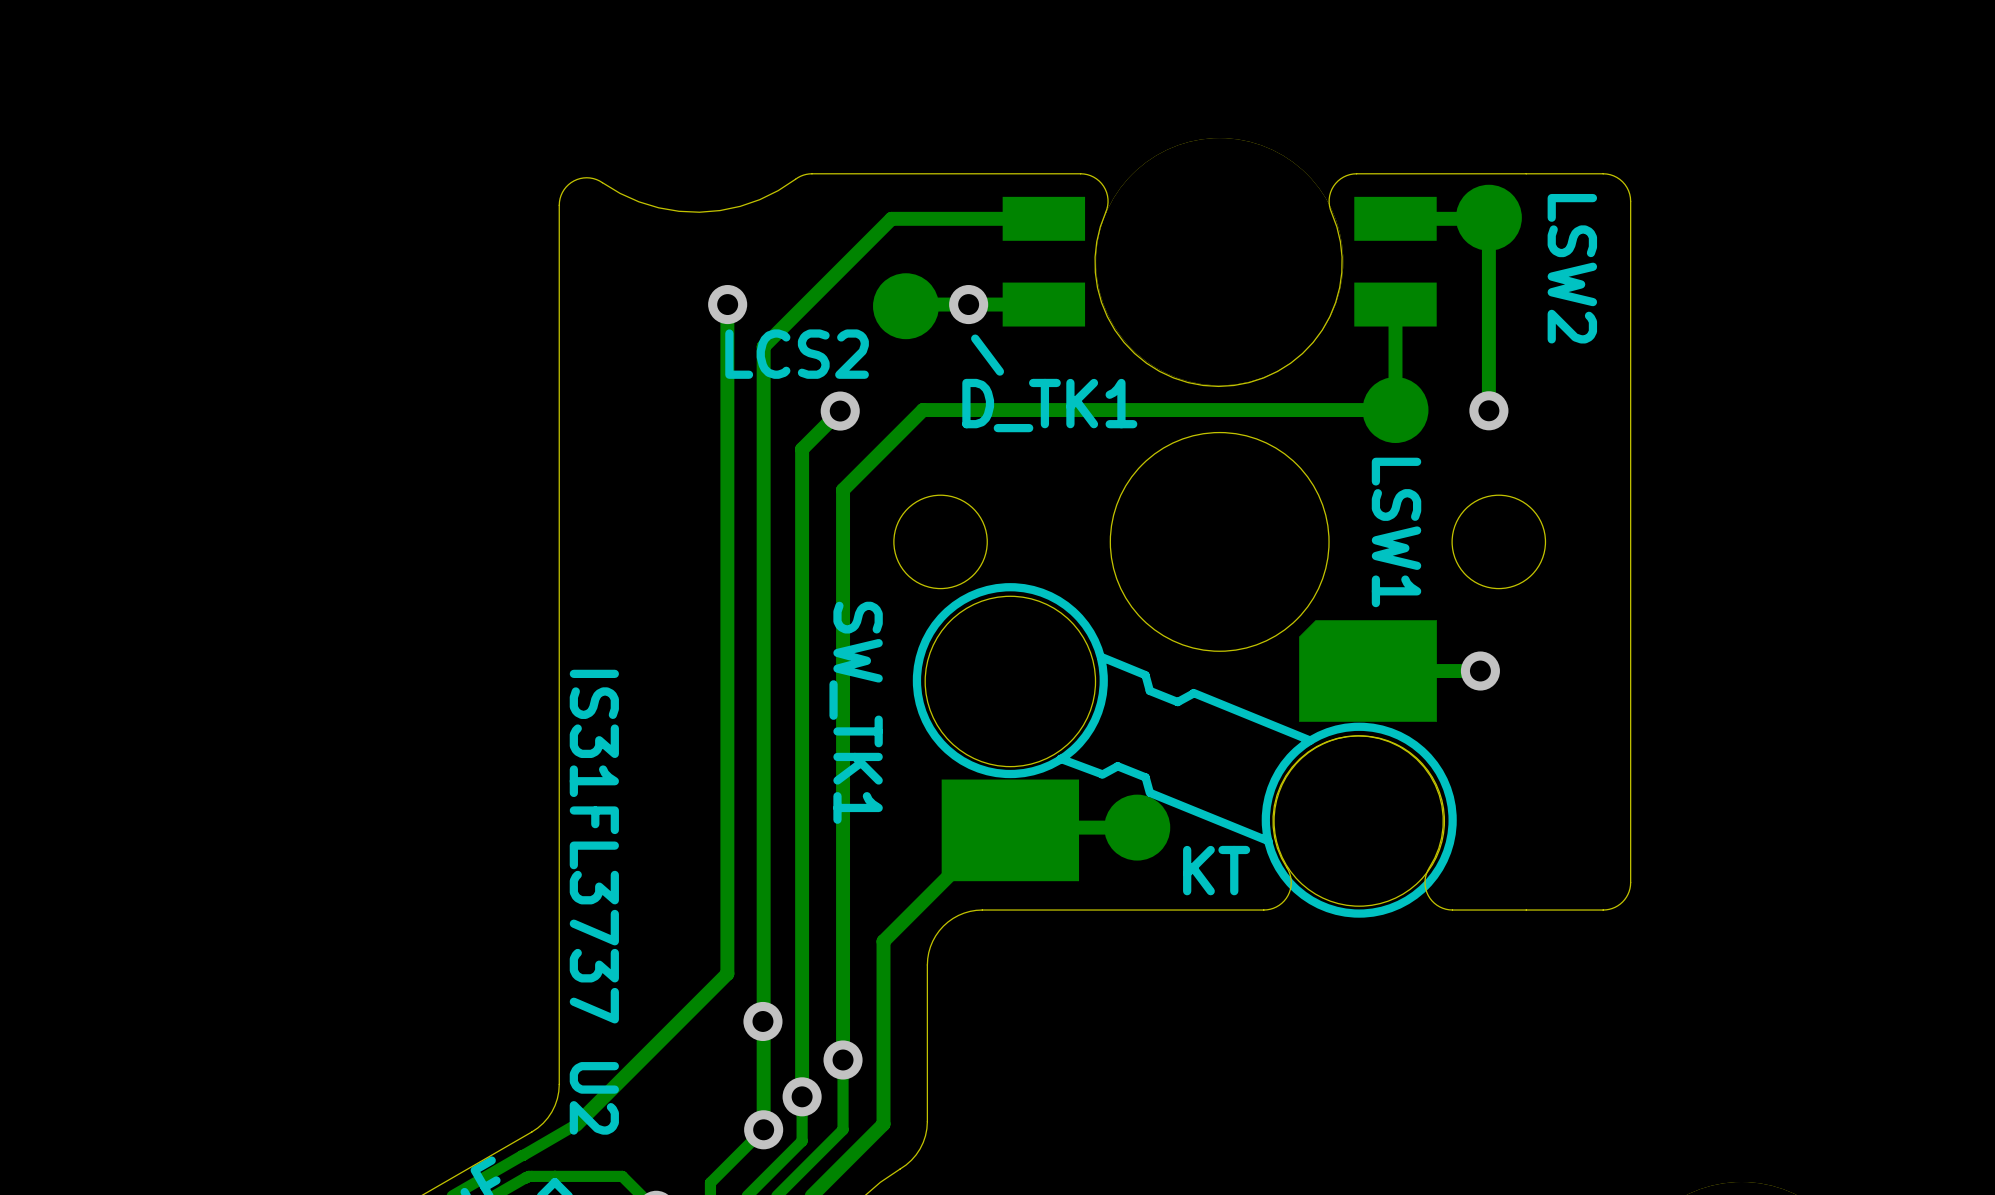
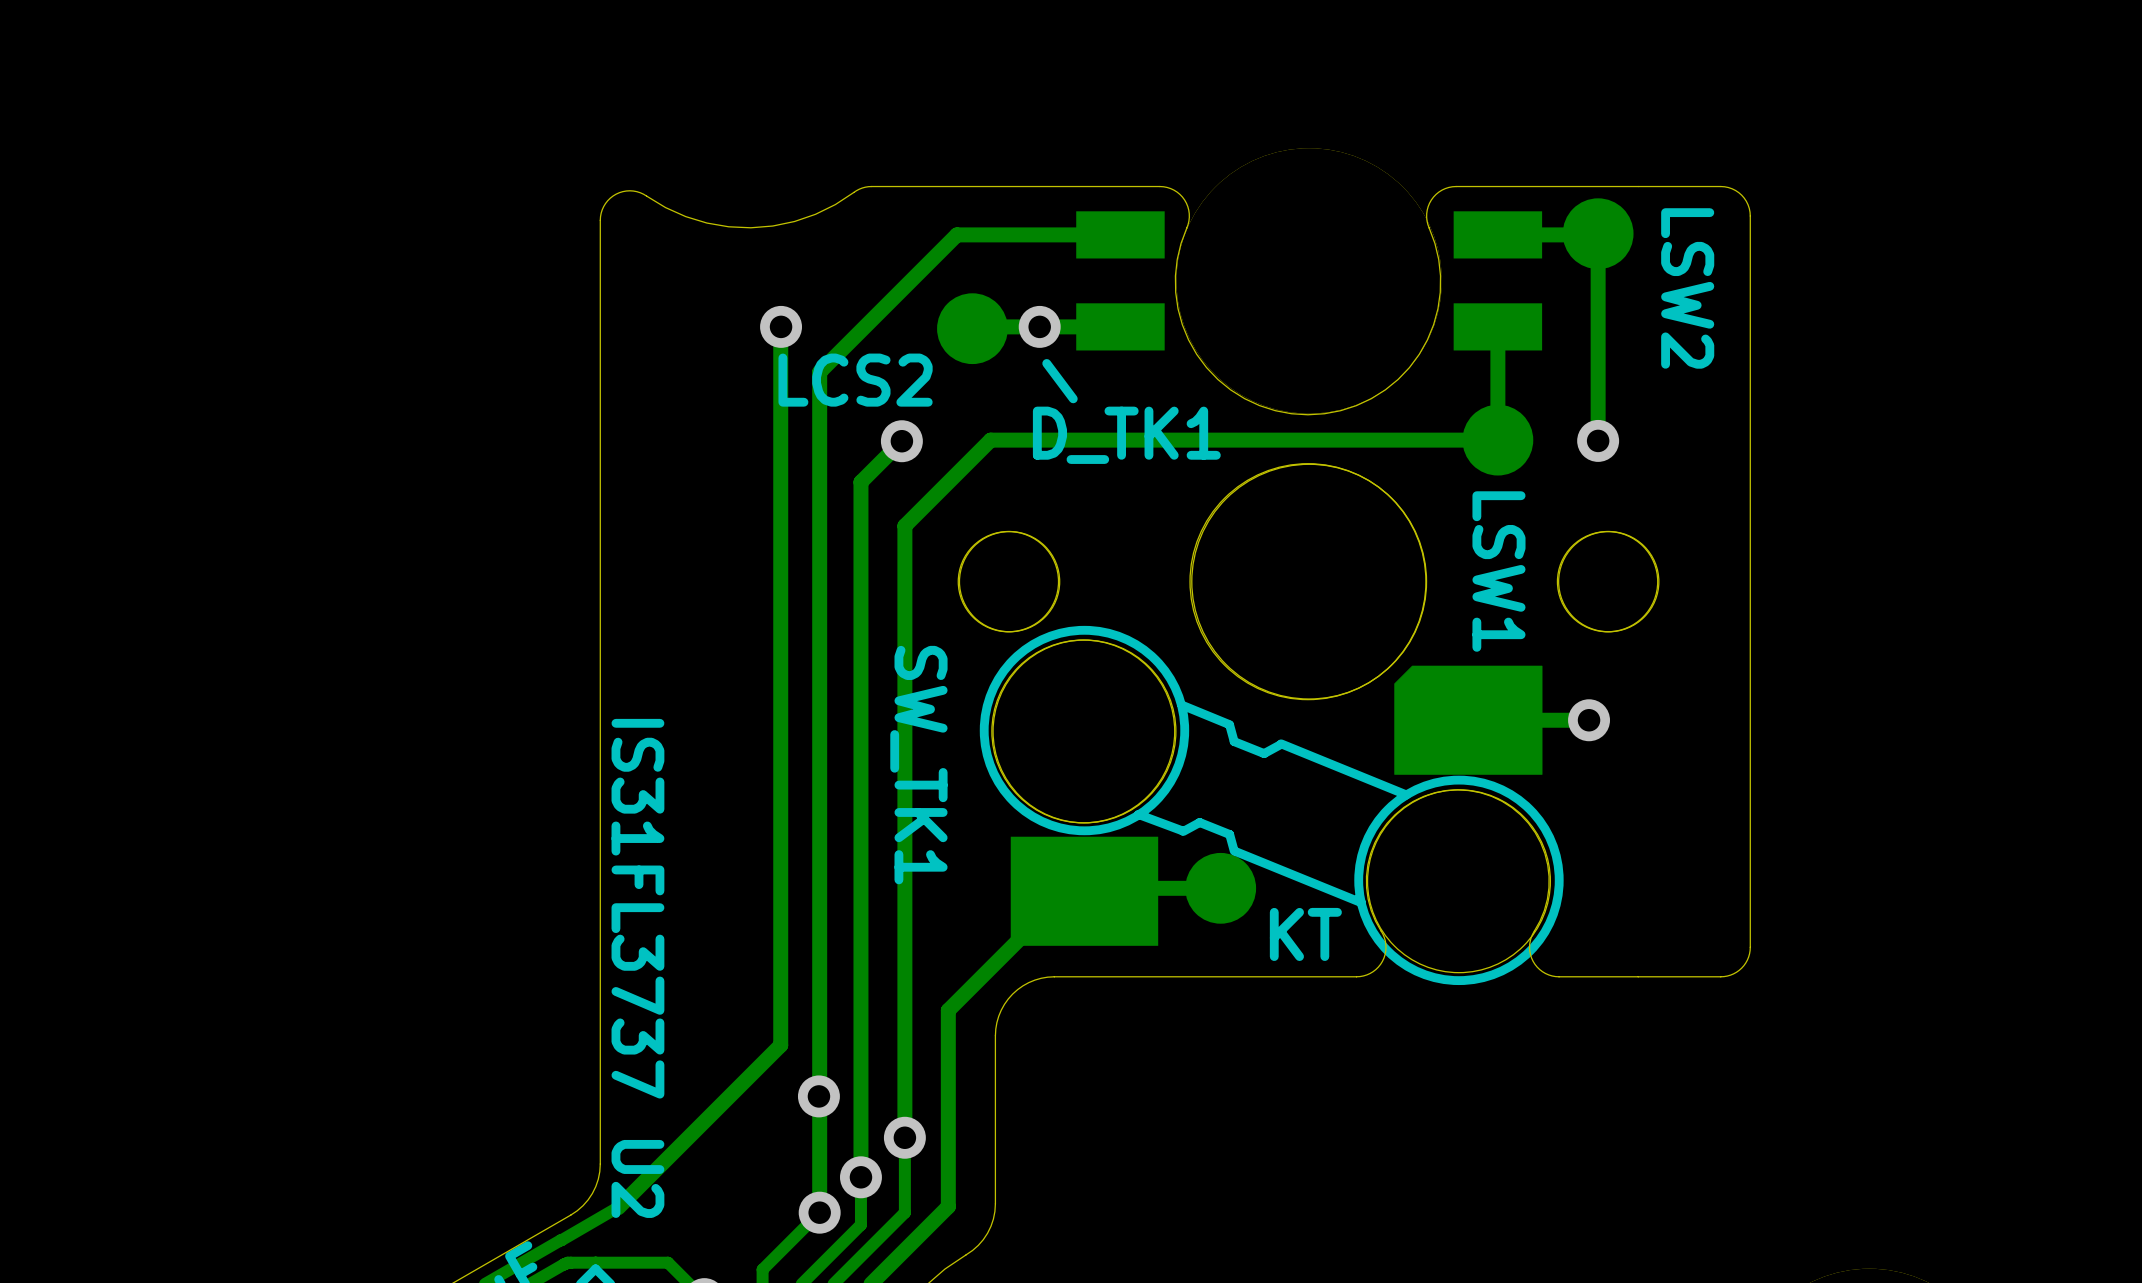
round board edge: none -> [1189, 463, 1427, 700]
round board edge: none -> [957, 531, 1059, 633]
round board edge: none -> [1557, 531, 1658, 633]
round board edge: none -> [991, 639, 1176, 824]

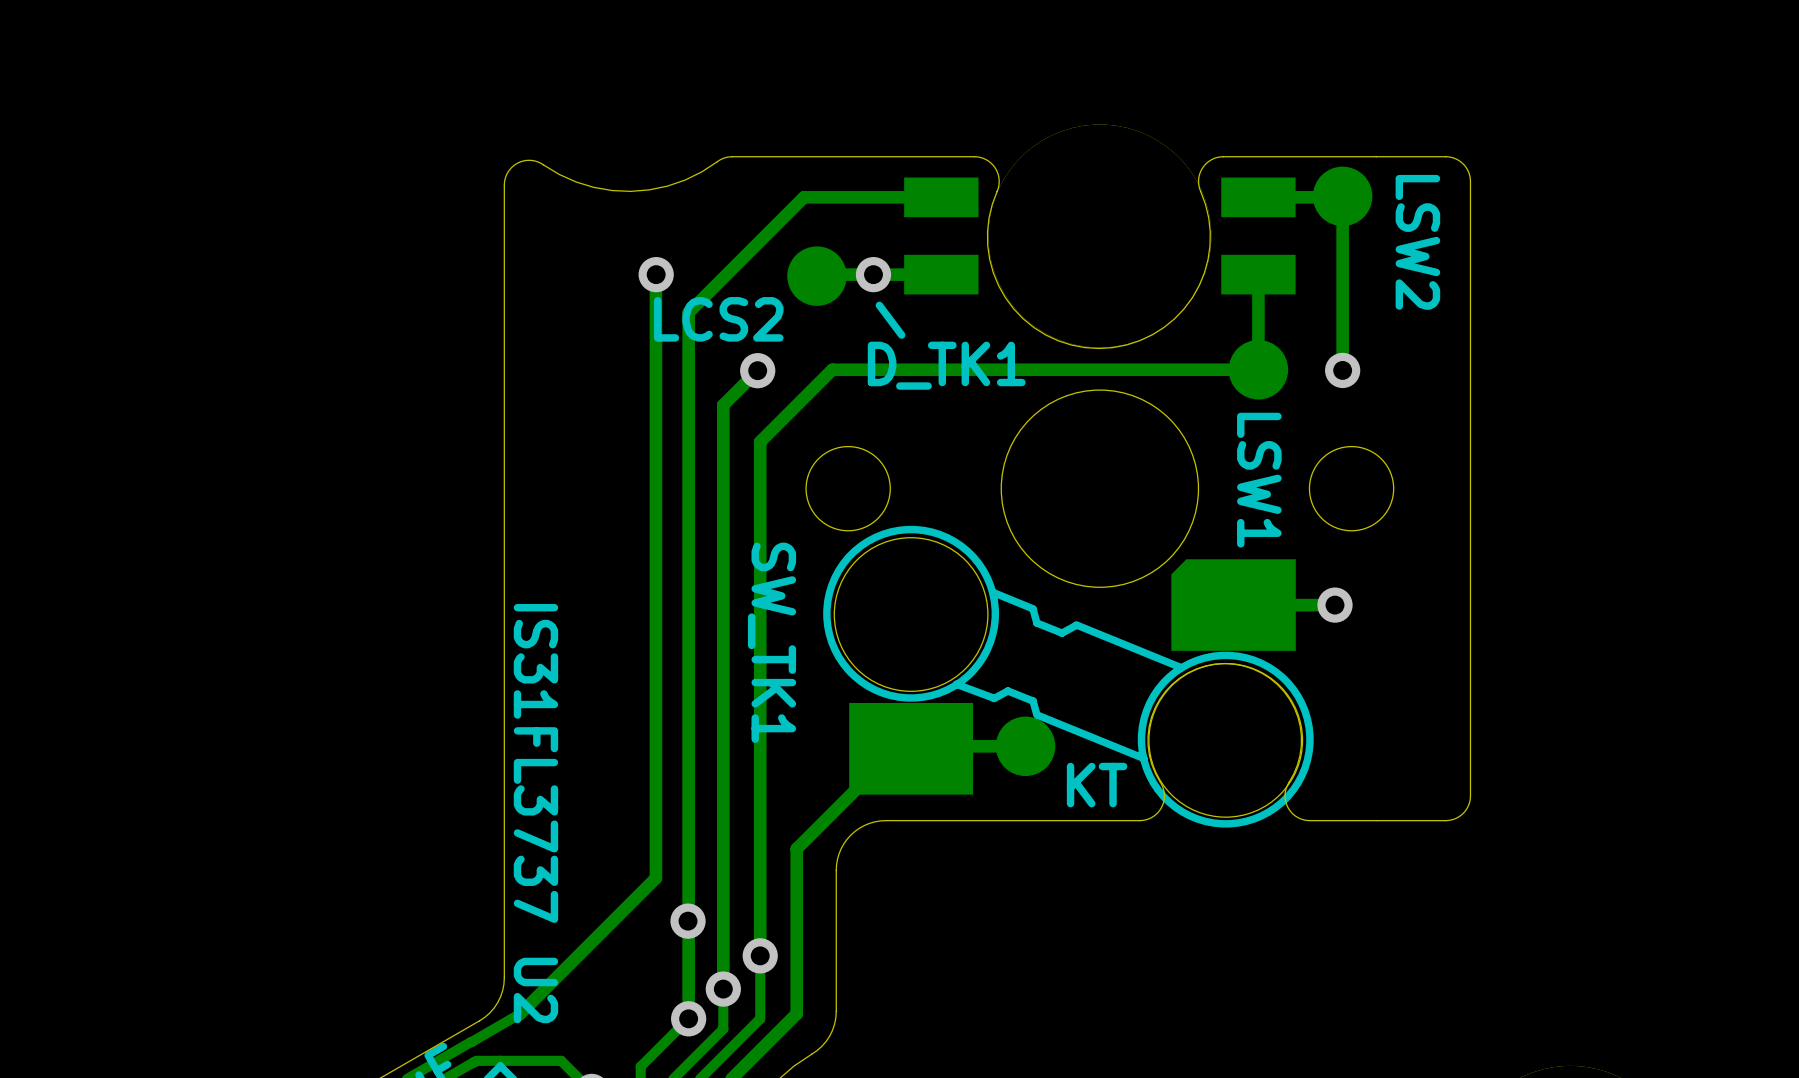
round board edge: [1189, 463, 1427, 700] -> none
round board edge: [957, 531, 1059, 633] -> none
round board edge: [1557, 531, 1658, 633] -> none
round board edge: [991, 639, 1176, 824] -> none

